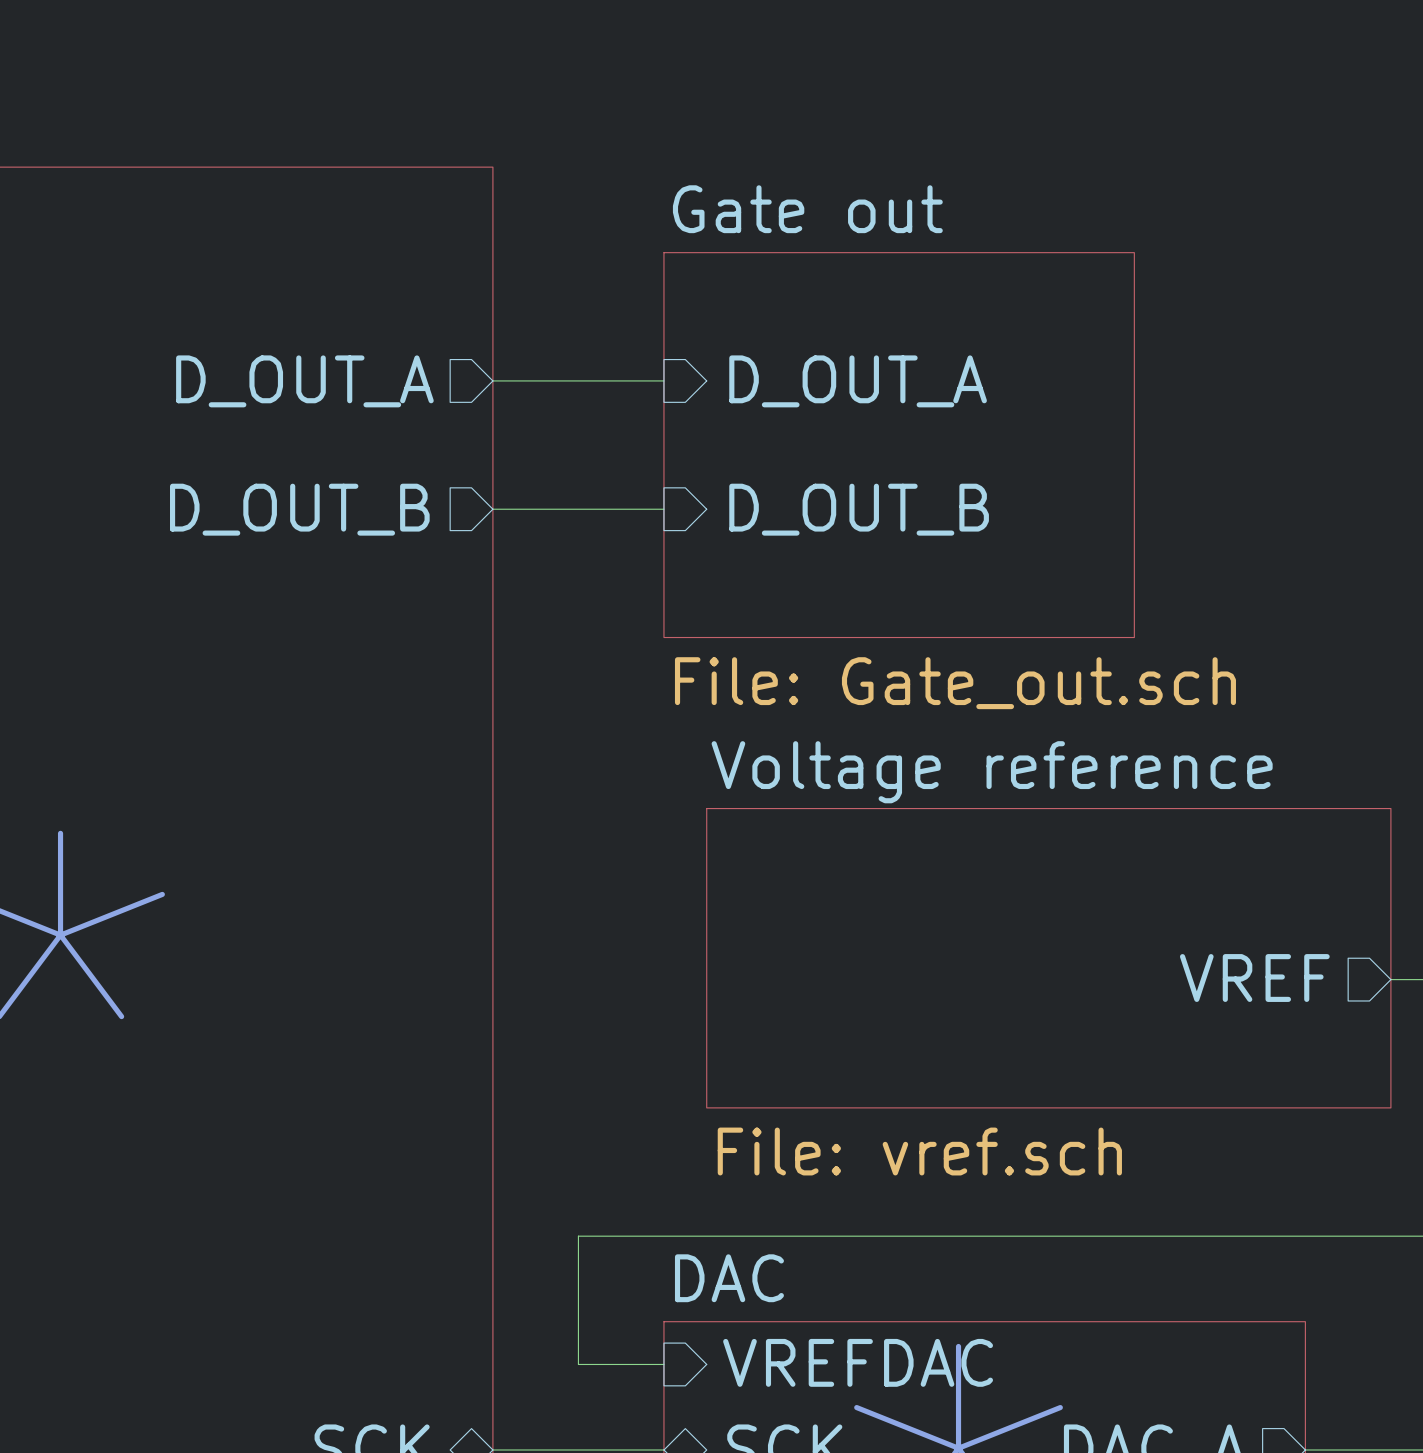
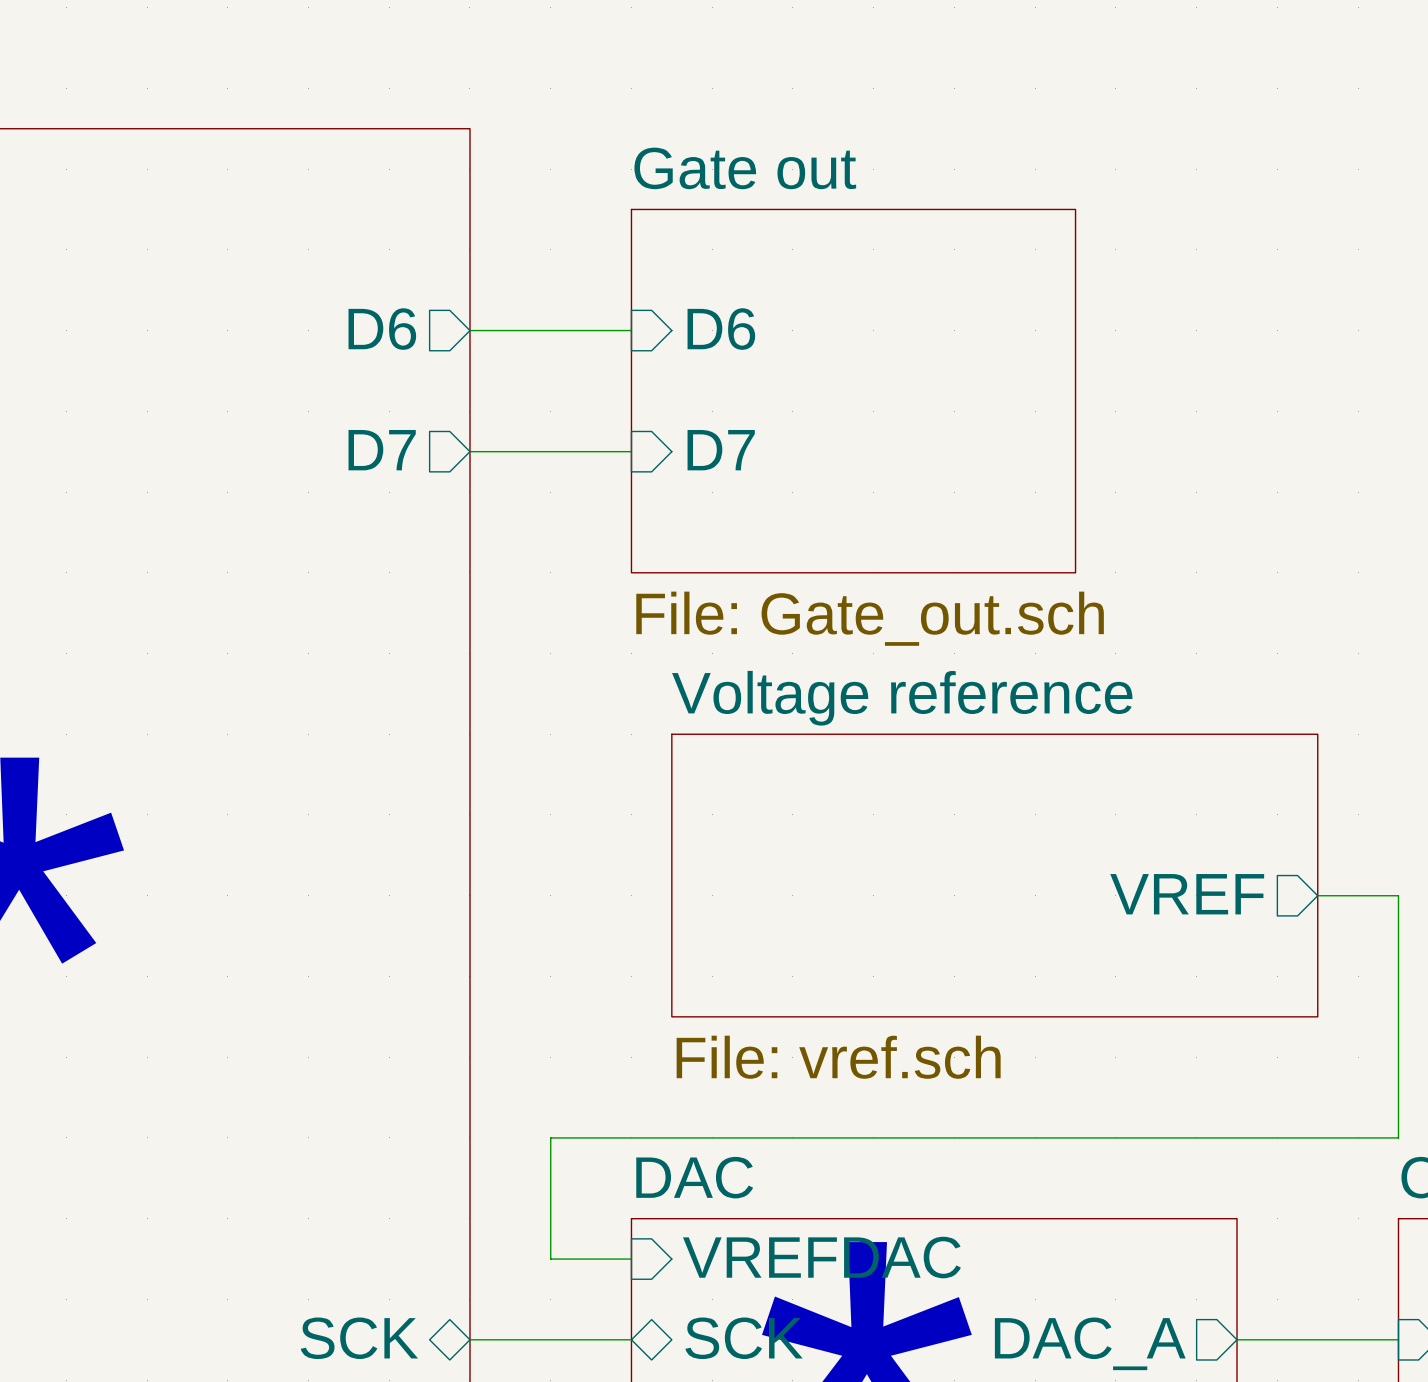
sheet pin: D_OUT_A (304, 381) -> D6 (382, 329)
sheet pin: D_OUT_A (858, 381) -> D6 (721, 329)
sheet pin: D_OUT_B (299, 509) -> D7 (382, 450)
sheet pin: D_OUT_B (859, 509) -> D7 (721, 450)

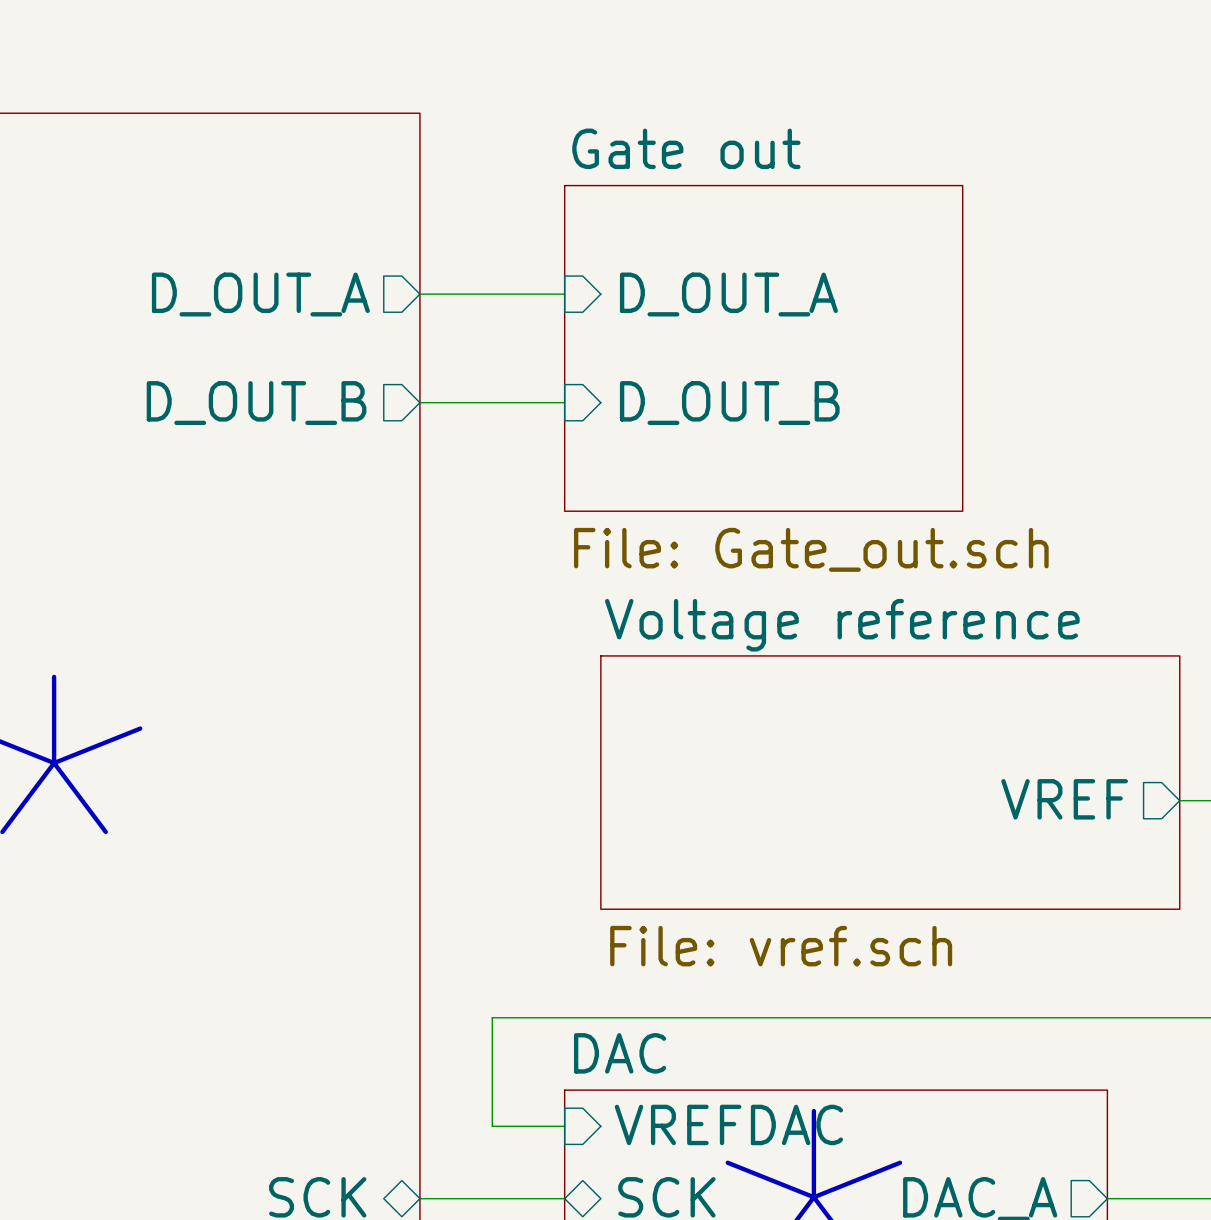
sheet pin: D6 (382, 329) -> D_OUT_A (260, 294)
sheet pin: D6 (721, 329) -> D_OUT_A (728, 294)
sheet pin: D7 (382, 450) -> D_OUT_B (256, 403)
sheet pin: D7 (721, 450) -> D_OUT_B (729, 403)

